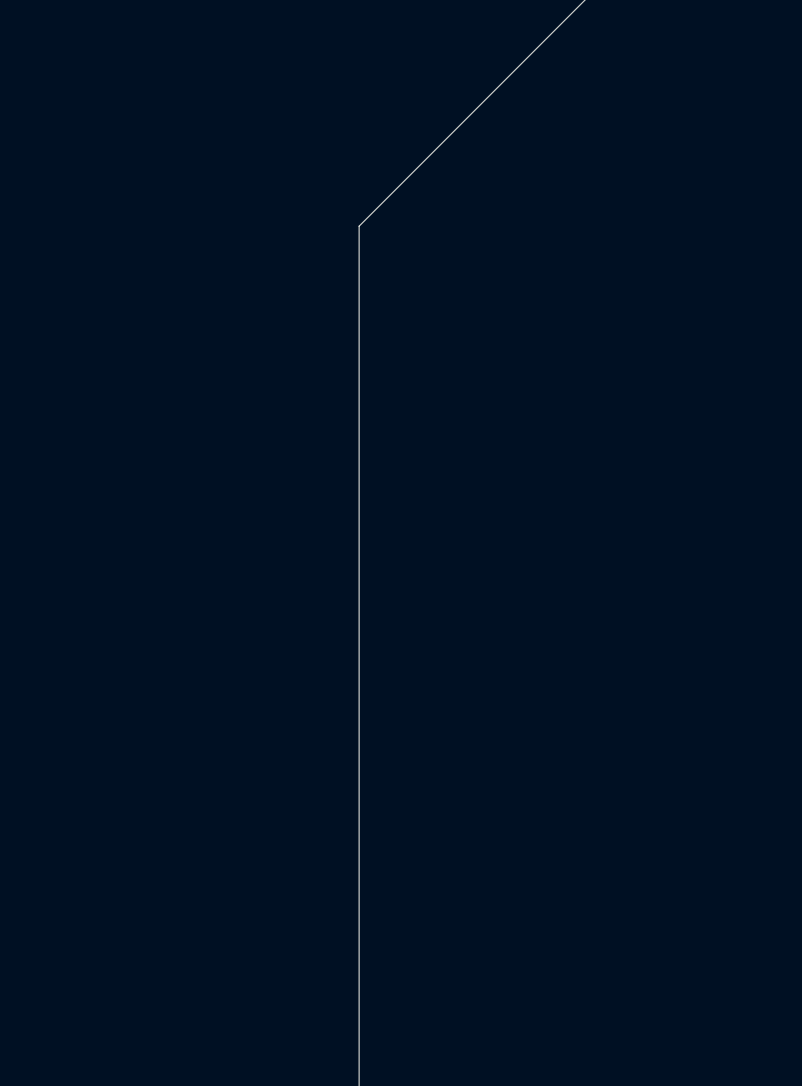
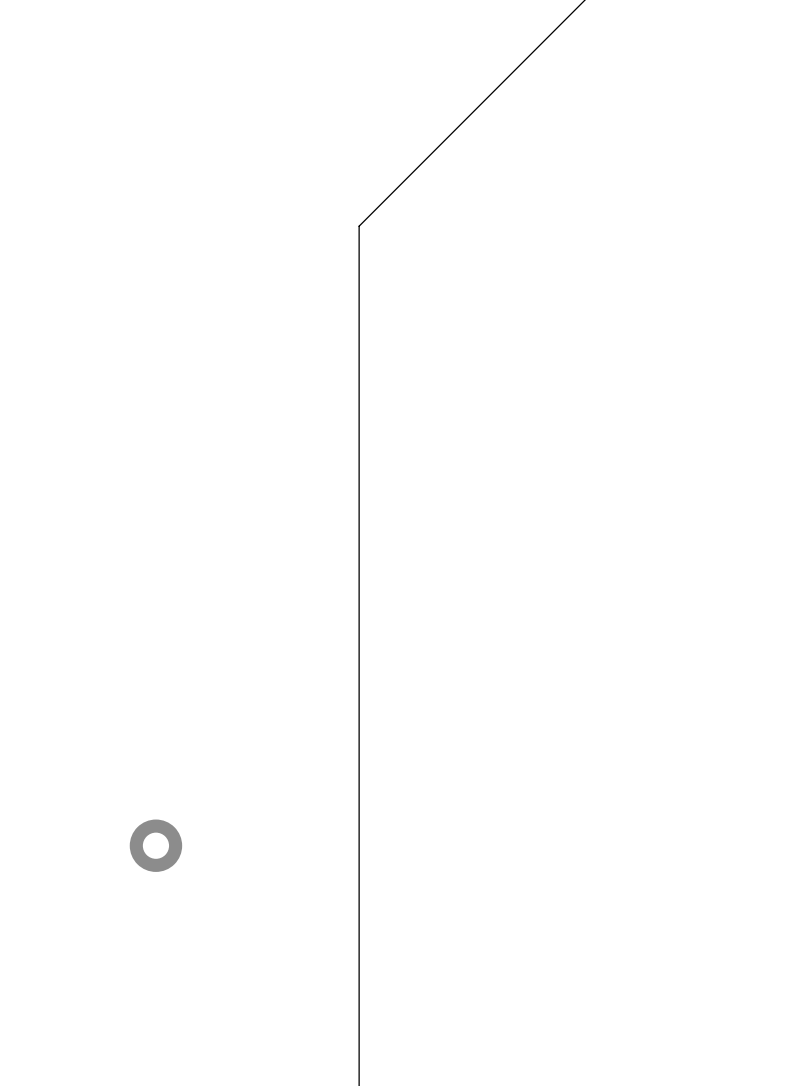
via: none -> (155, 845)

